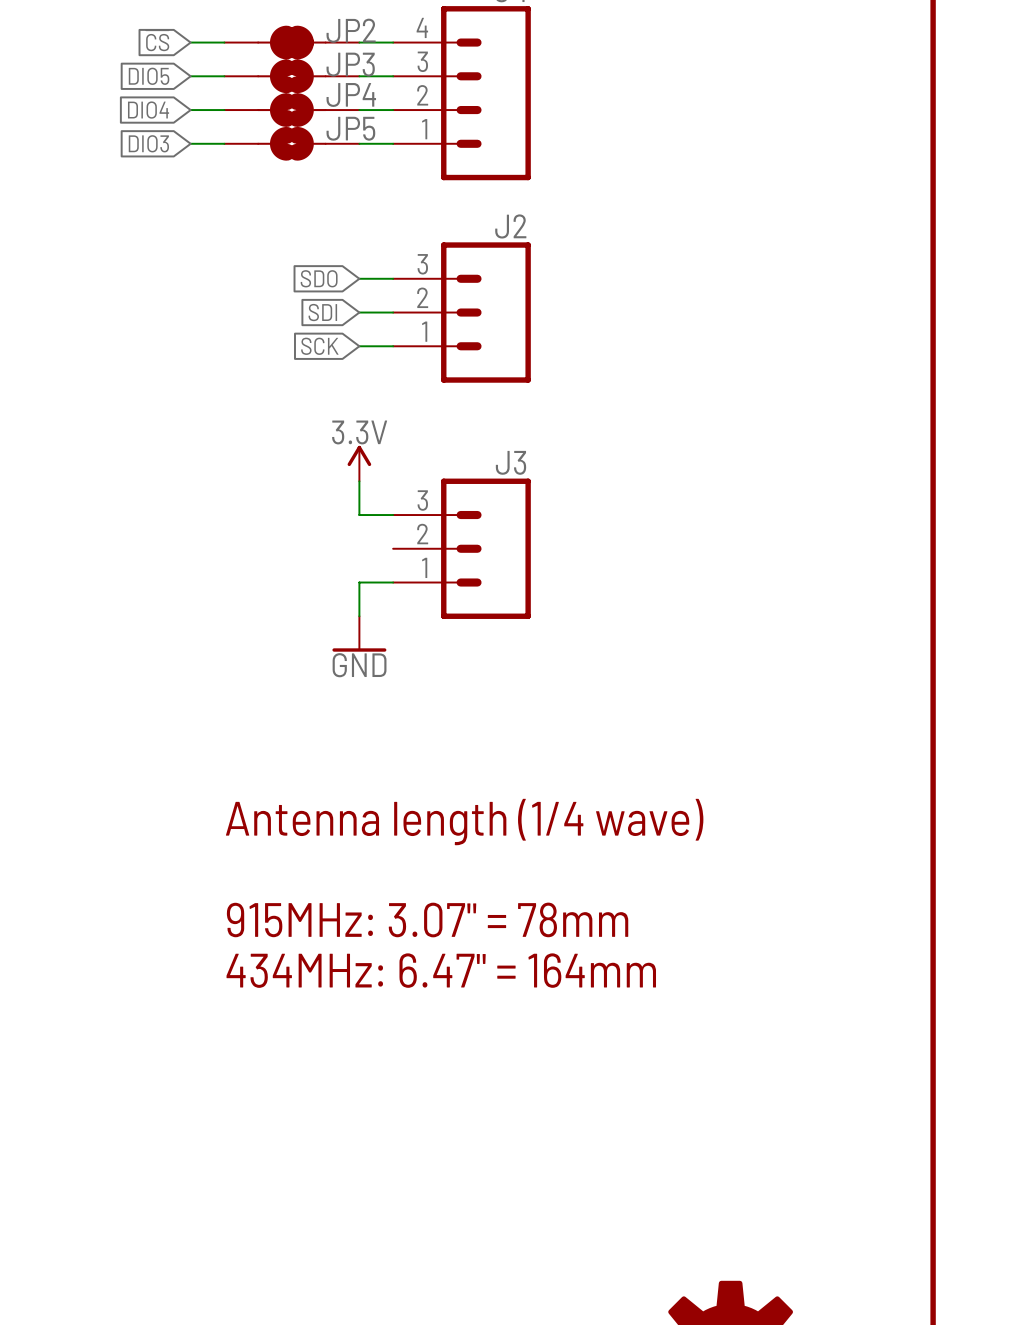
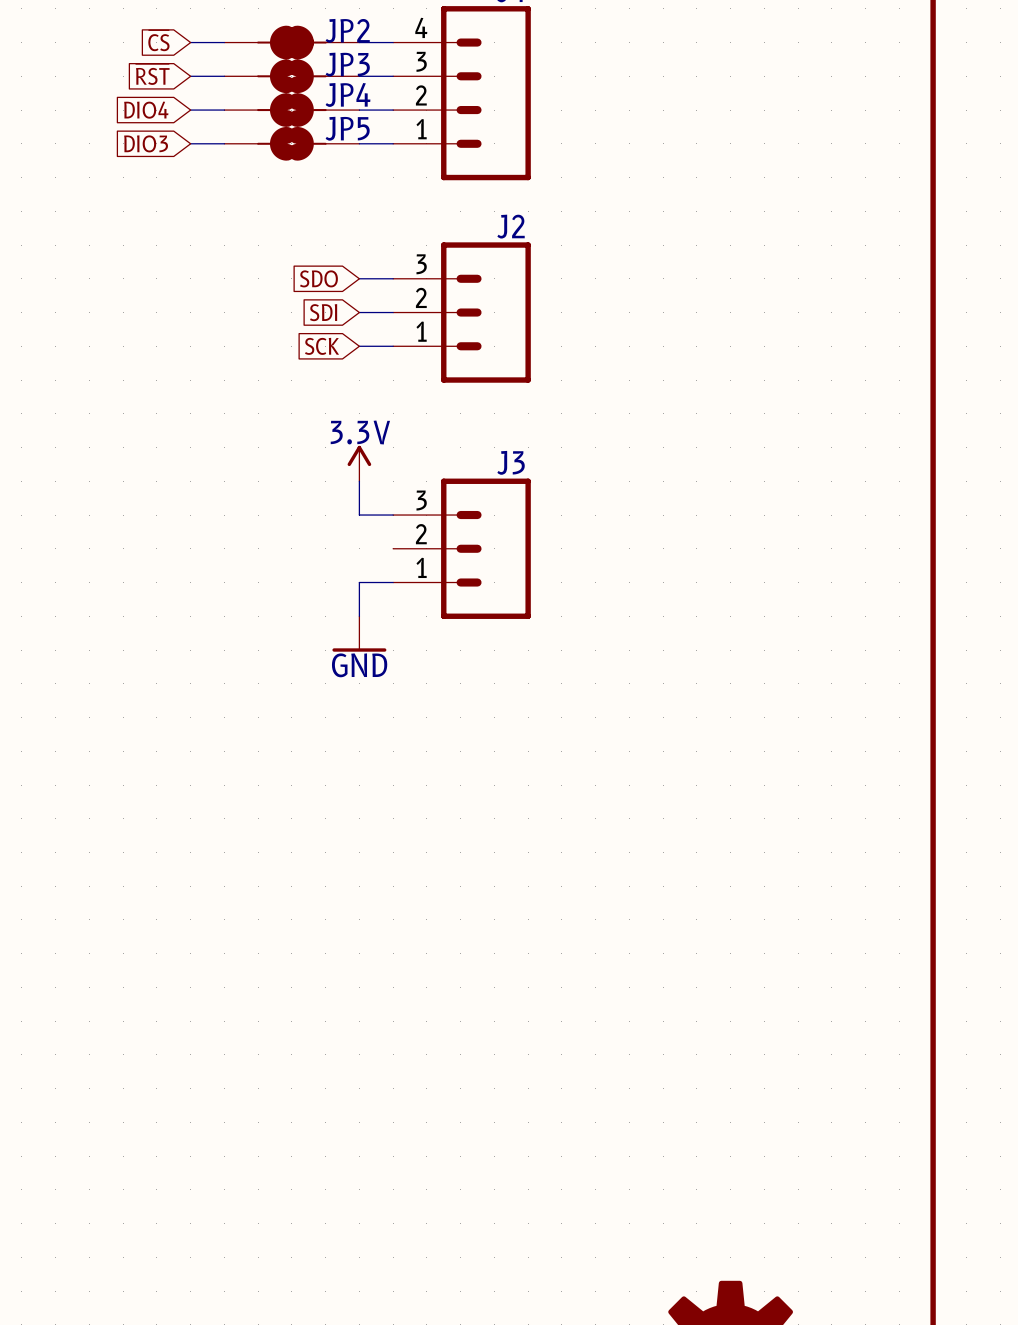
global label: DIO5 (149, 76) -> ~{RST} (152, 74)
text: Antenna length (1/4 wave) (464, 822) -> none
text: 915MHz: 3.07" = 78mm (427, 919) -> none
text: 434MHz: 6.47" = 164mm (441, 970) -> none

